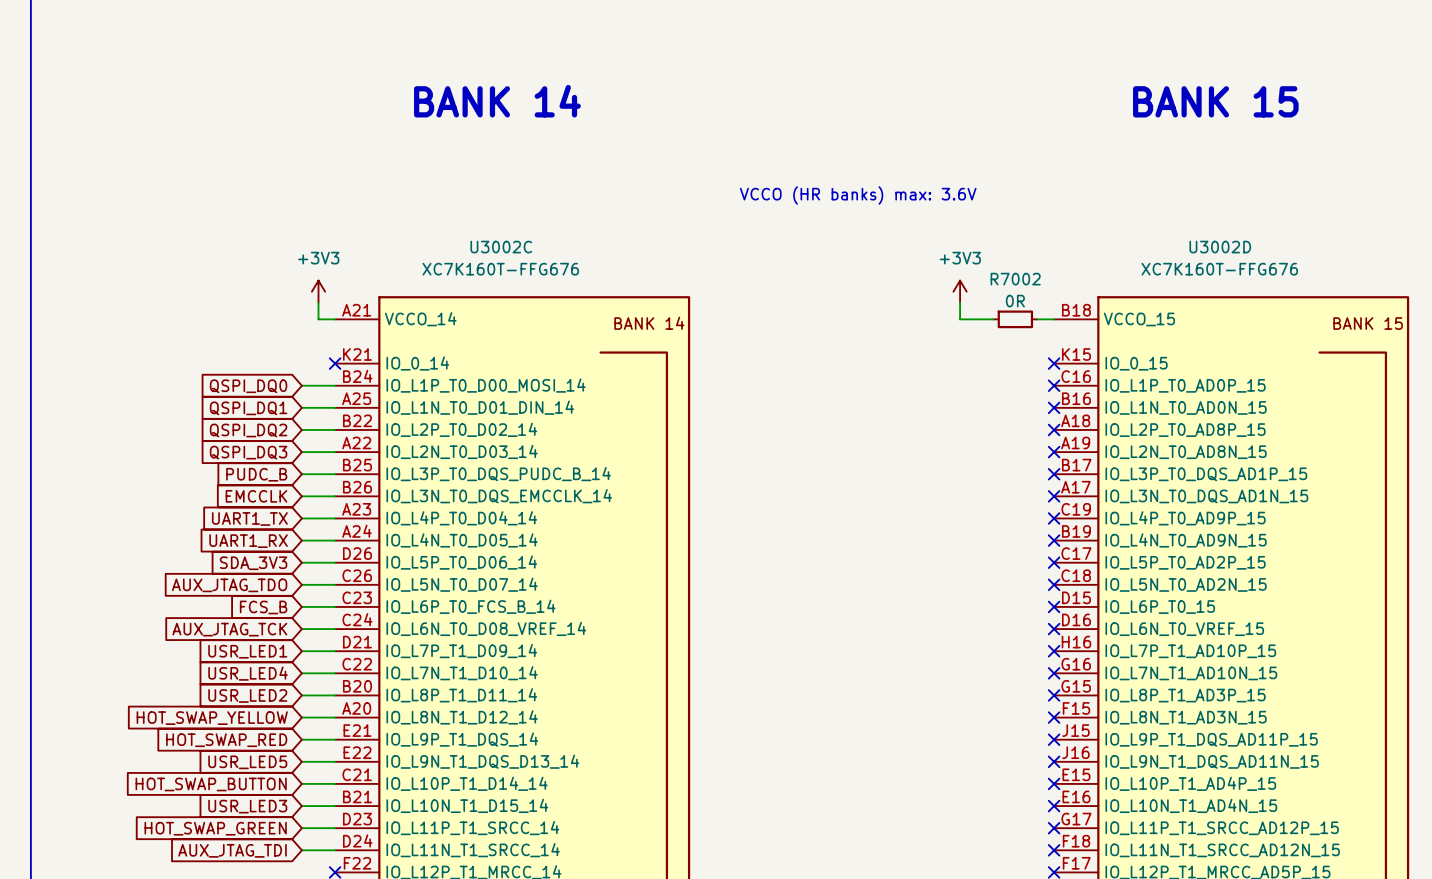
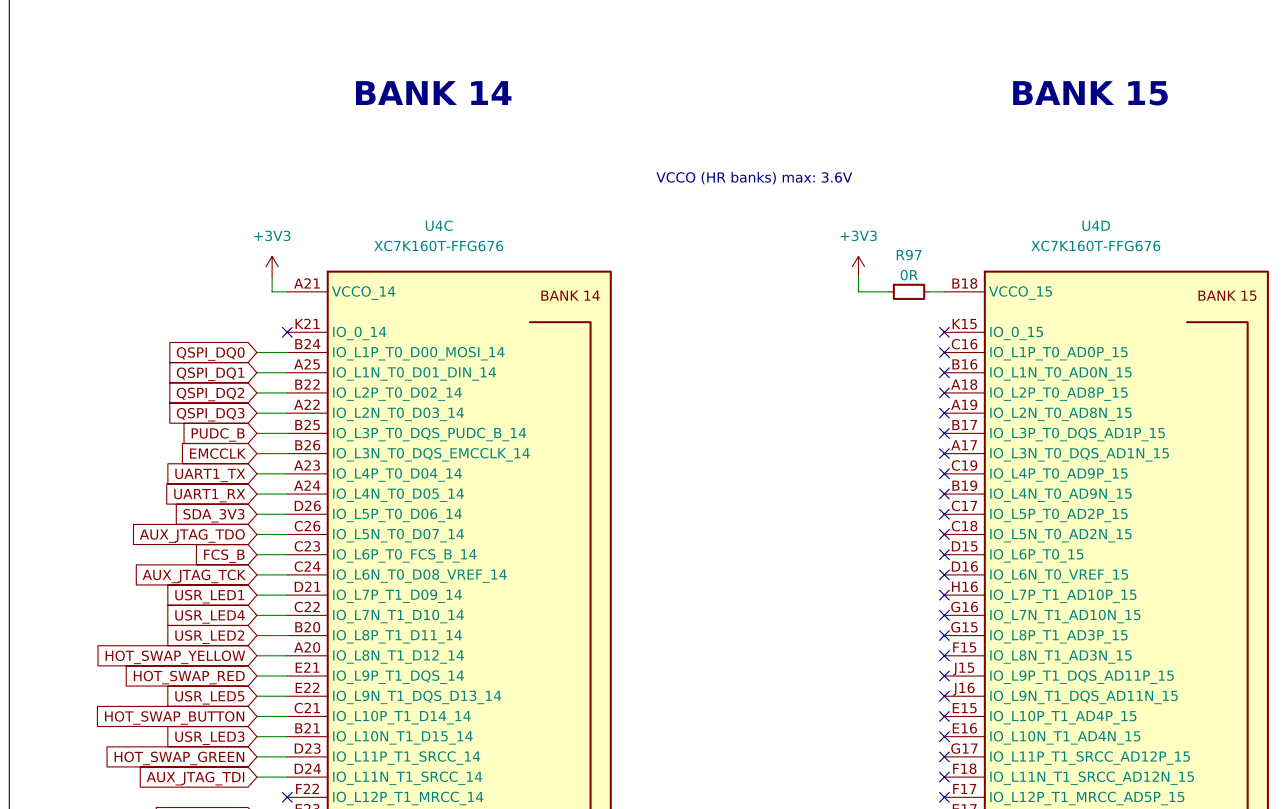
U3002C name: U3002C (501, 247) -> U4C (439, 225)
U3002D name: U3002D (1220, 247) -> U4D (1096, 225)
R7002 name: R7002 (1015, 279) -> R97 (909, 255)

